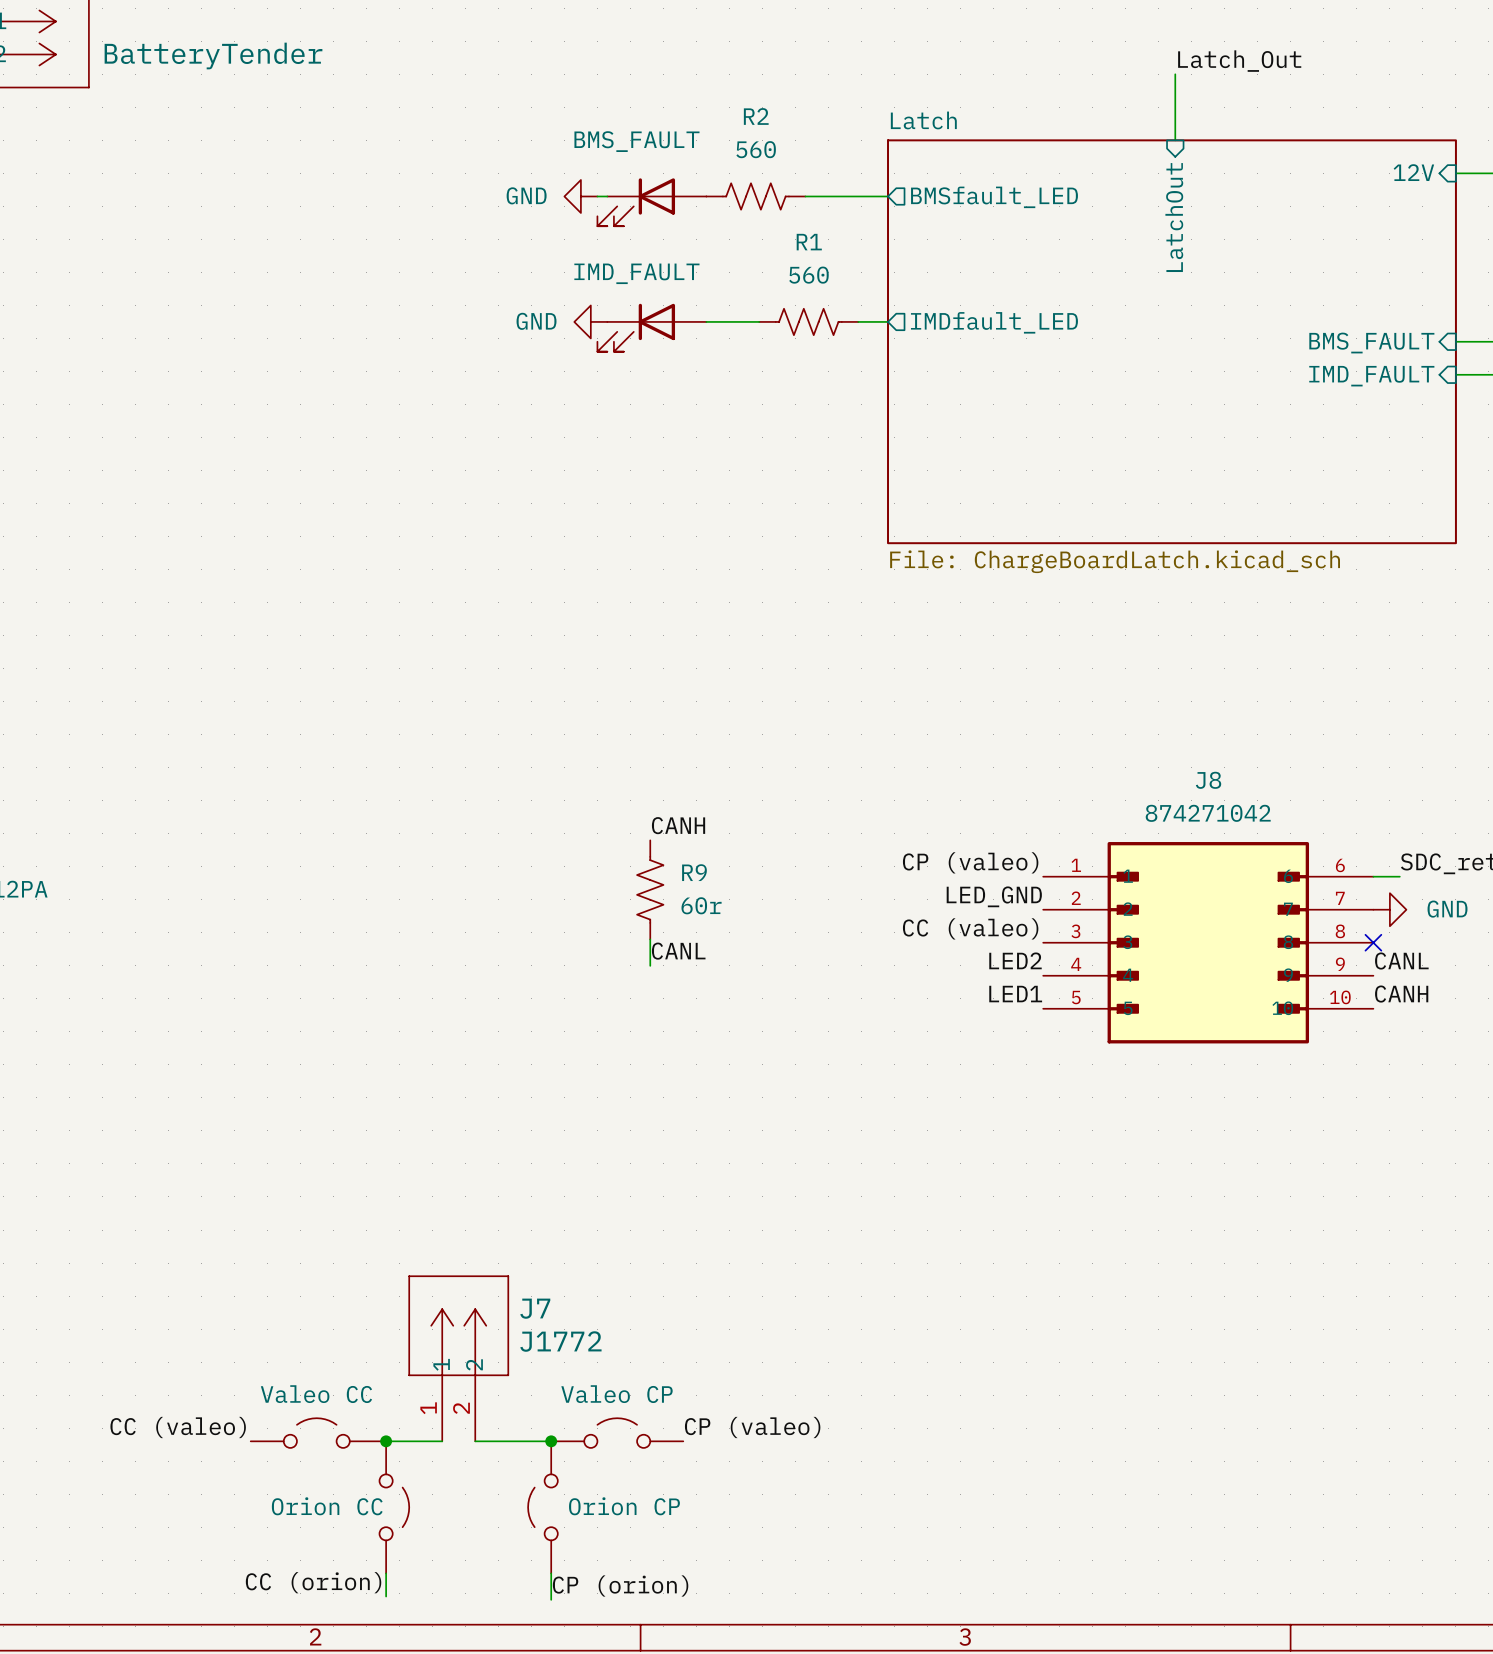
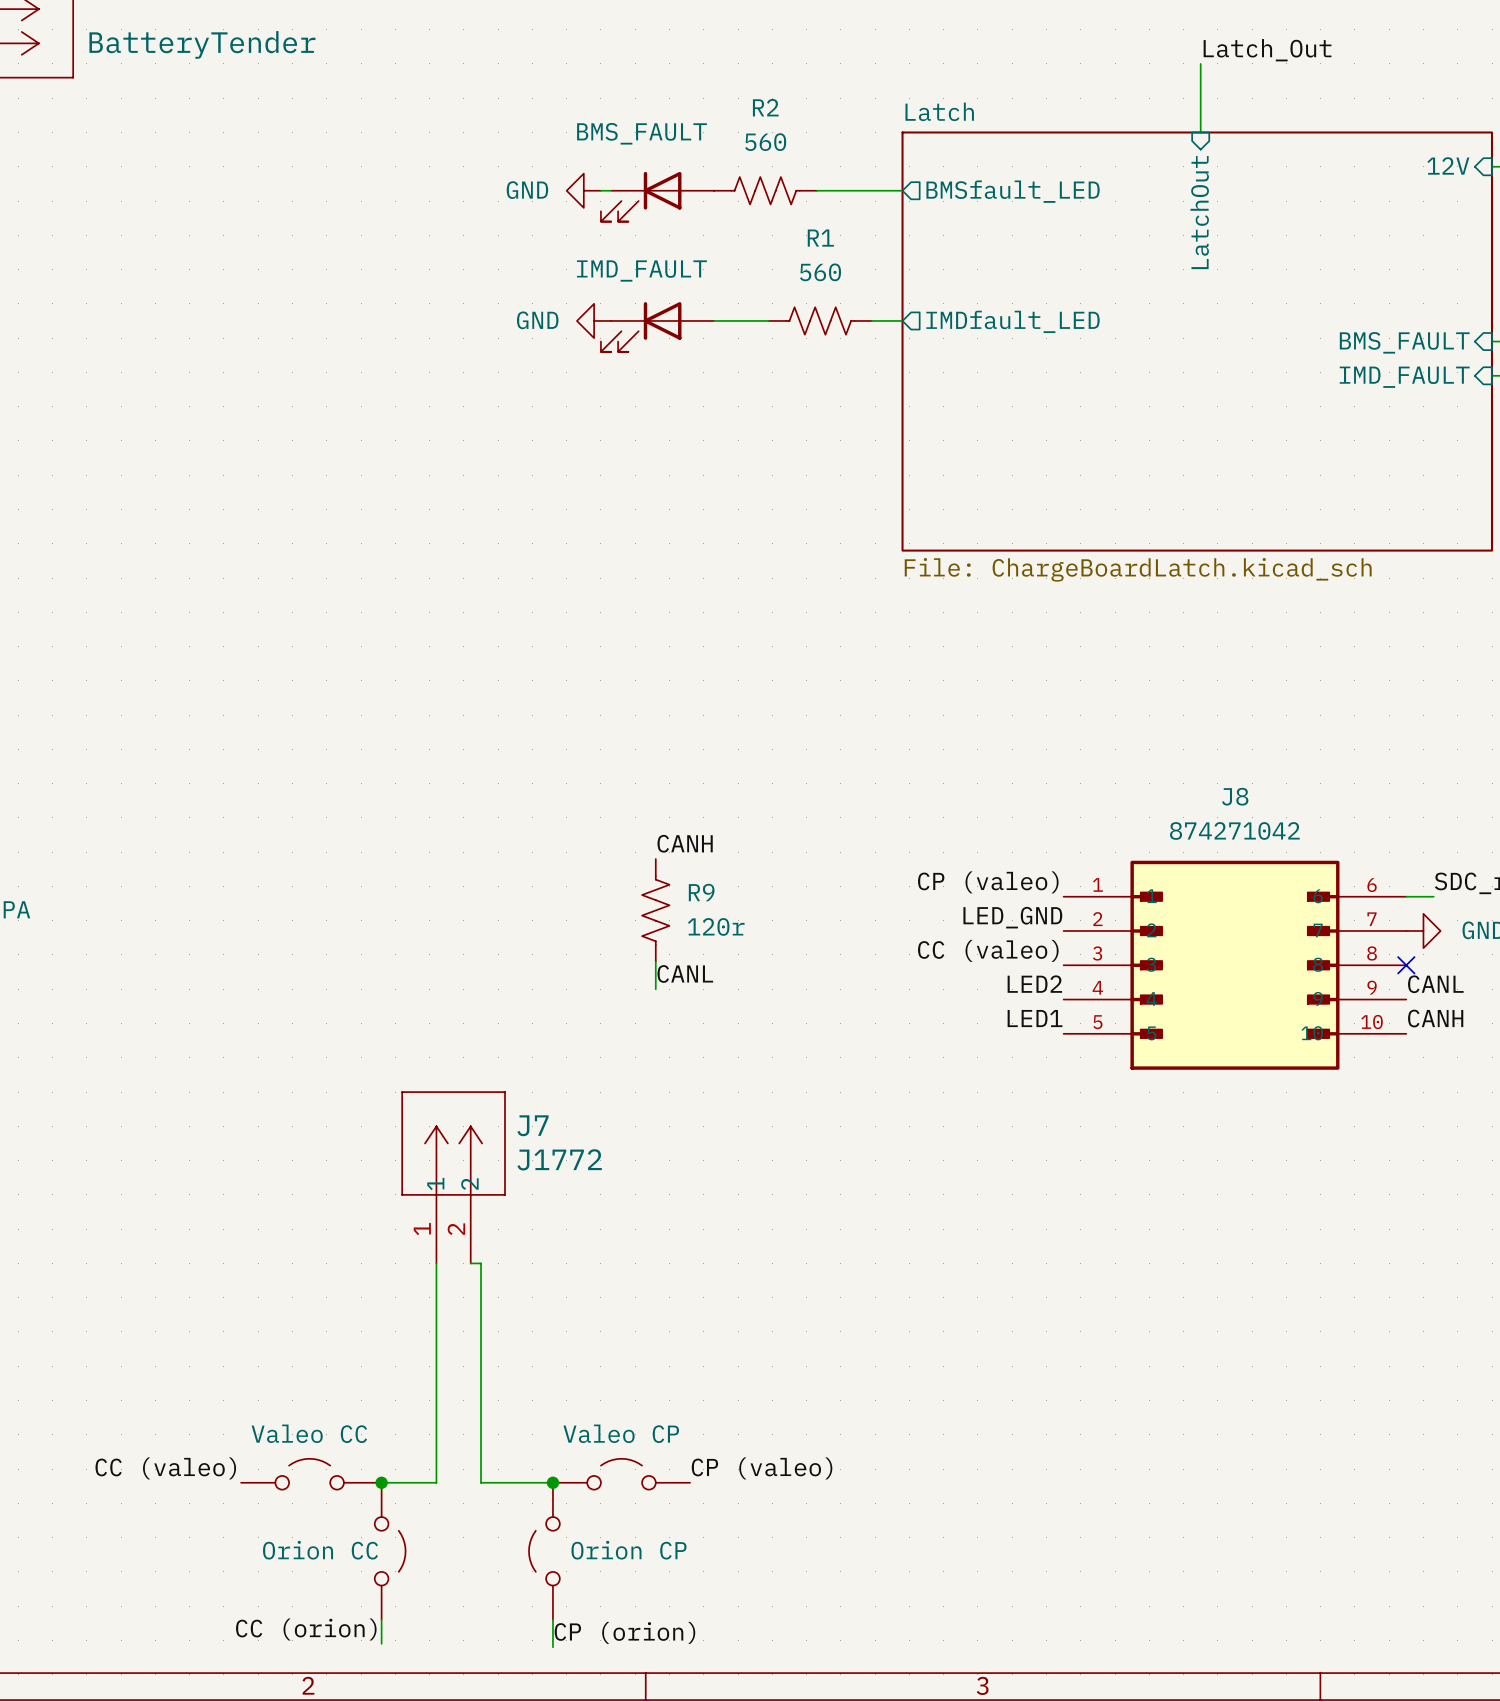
R9 value: 60r (701, 905) -> 120r (716, 926)
J7 position: (458, 1358) -> (453, 1177)
wire: (438, 1441) (442, 1441) -> (436, 1482) (436, 1263)
wire: (475, 1441) (481, 1441) -> (470, 1263) (480, 1263) (480, 1482)

